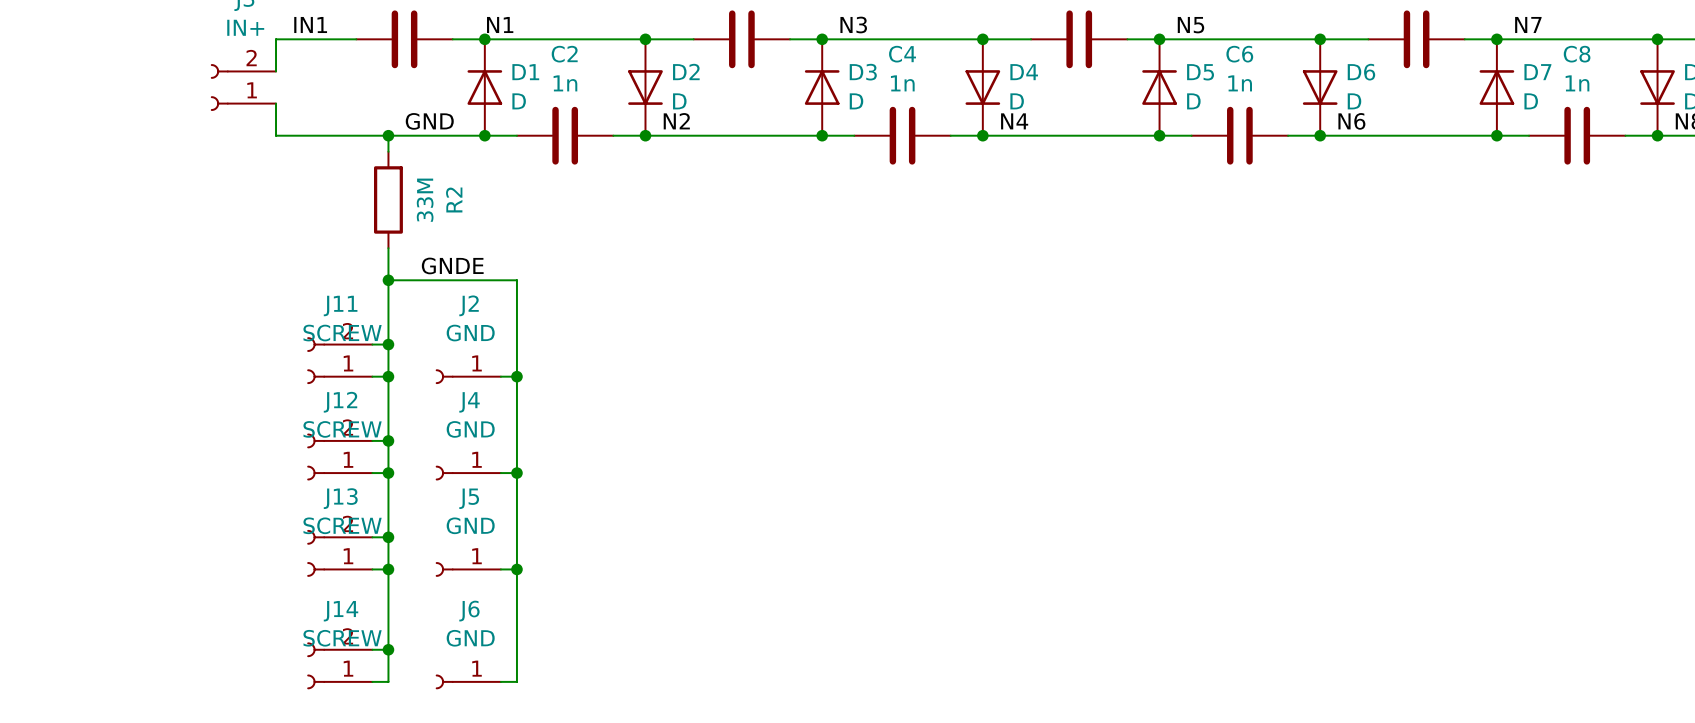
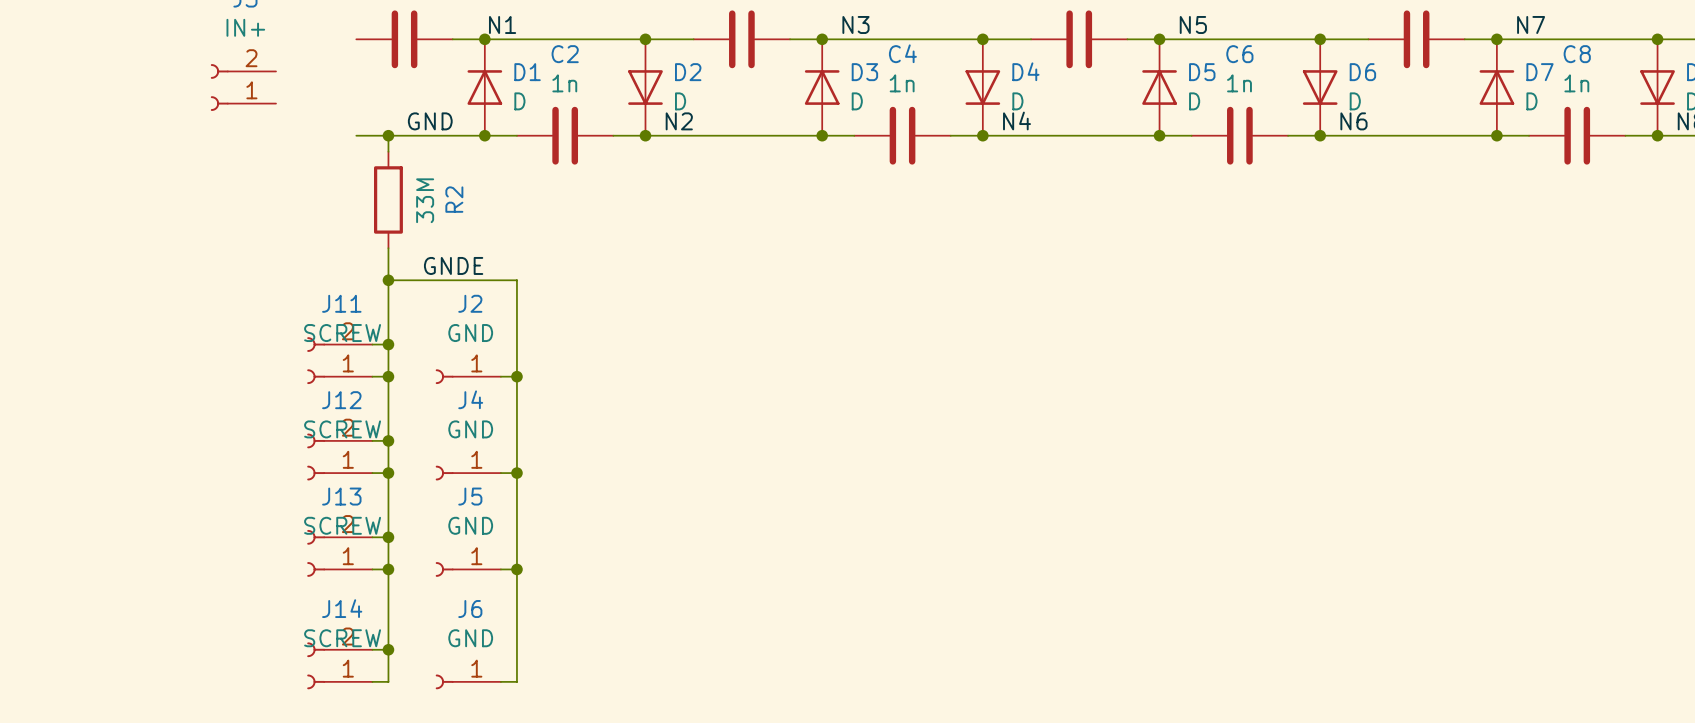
label: IN1 (310, 24) -> none
wire: (356, 39) (276, 39) (276, 71) -> none
wire: (276, 103) (276, 135) (356, 135) -> none

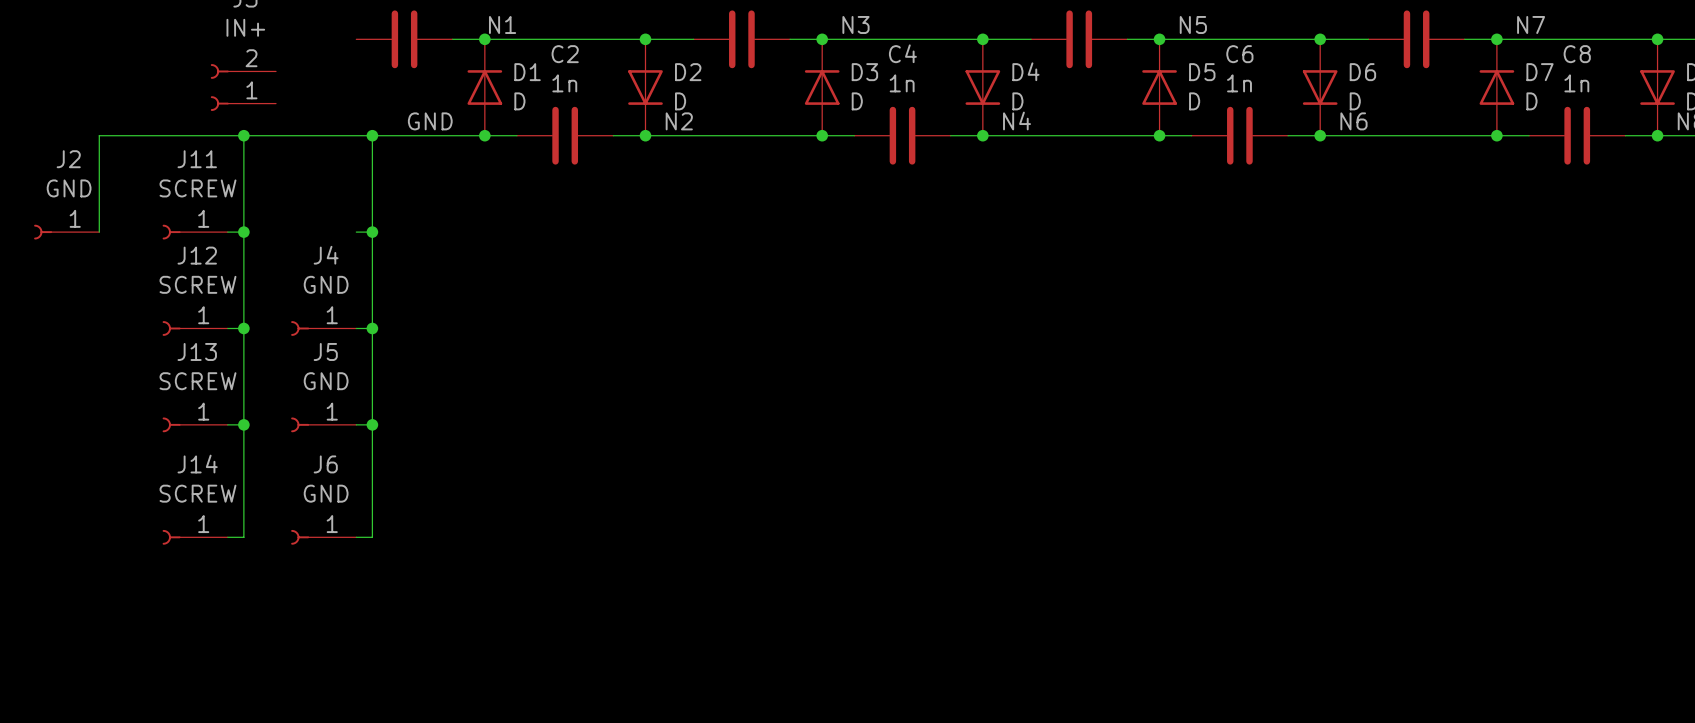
wire: none -> (243, 135) (243, 537) (227, 537)
junction: none -> (243, 135)
wire: none -> (356, 135) (99, 135) (99, 232)
wire: none -> (372, 135) (372, 537) (356, 537)
wire: (388, 135) (388, 151) -> none
junction position: (388, 135) -> (372, 135)
R2: 33M (388, 199) -> none
junction: none -> (243, 232)
junction: none -> (372, 232)
wire: (388, 248) (388, 681) (372, 681) -> none
label: GNDE (453, 265) -> none
wire: (388, 280) (516, 280) (516, 681) (500, 681) -> none
junction: (388, 280) -> none
junction: none -> (243, 328)
J11 symbol: [307, 337, 373, 385] -> [162, 224, 228, 240]
wire: (372, 344) (388, 344) -> none
junction position: (388, 344) -> (372, 328)
wire: (372, 376) (388, 376) -> (227, 232) (243, 232)
junction: (388, 376) -> none
J2 position: (468, 376) -> (66, 232)
wire: (500, 376) (516, 376) -> (356, 232) (372, 232)
junction: (516, 376) -> none
junction: none -> (243, 424)
J12 symbol: [307, 433, 373, 481] -> [162, 321, 228, 336]
wire: (372, 440) (388, 440) -> none
junction position: (388, 440) -> (372, 424)
wire: (372, 473) (388, 473) -> (227, 328) (243, 328)
junction: (388, 473) -> none
J4 position: (468, 473) -> (323, 328)
wire: (500, 473) (516, 473) -> (356, 328) (372, 328)
junction: (516, 473) -> none
J13 symbol: [307, 529, 373, 577] -> [162, 417, 228, 433]
wire: (372, 537) (388, 537) -> none
junction: (388, 537) -> none
wire: (372, 569) (388, 569) -> (227, 424) (243, 424)
junction: (388, 569) -> none
J5 position: (468, 569) -> (323, 424)
wire: (500, 569) (516, 569) -> (356, 424) (372, 424)
junction: (516, 569) -> none
J14 symbol: [307, 642, 373, 690] -> [162, 529, 228, 545]
wire: (372, 649) (388, 649) -> none
junction: (388, 649) -> none
J6 position: (468, 681) -> (323, 537)

